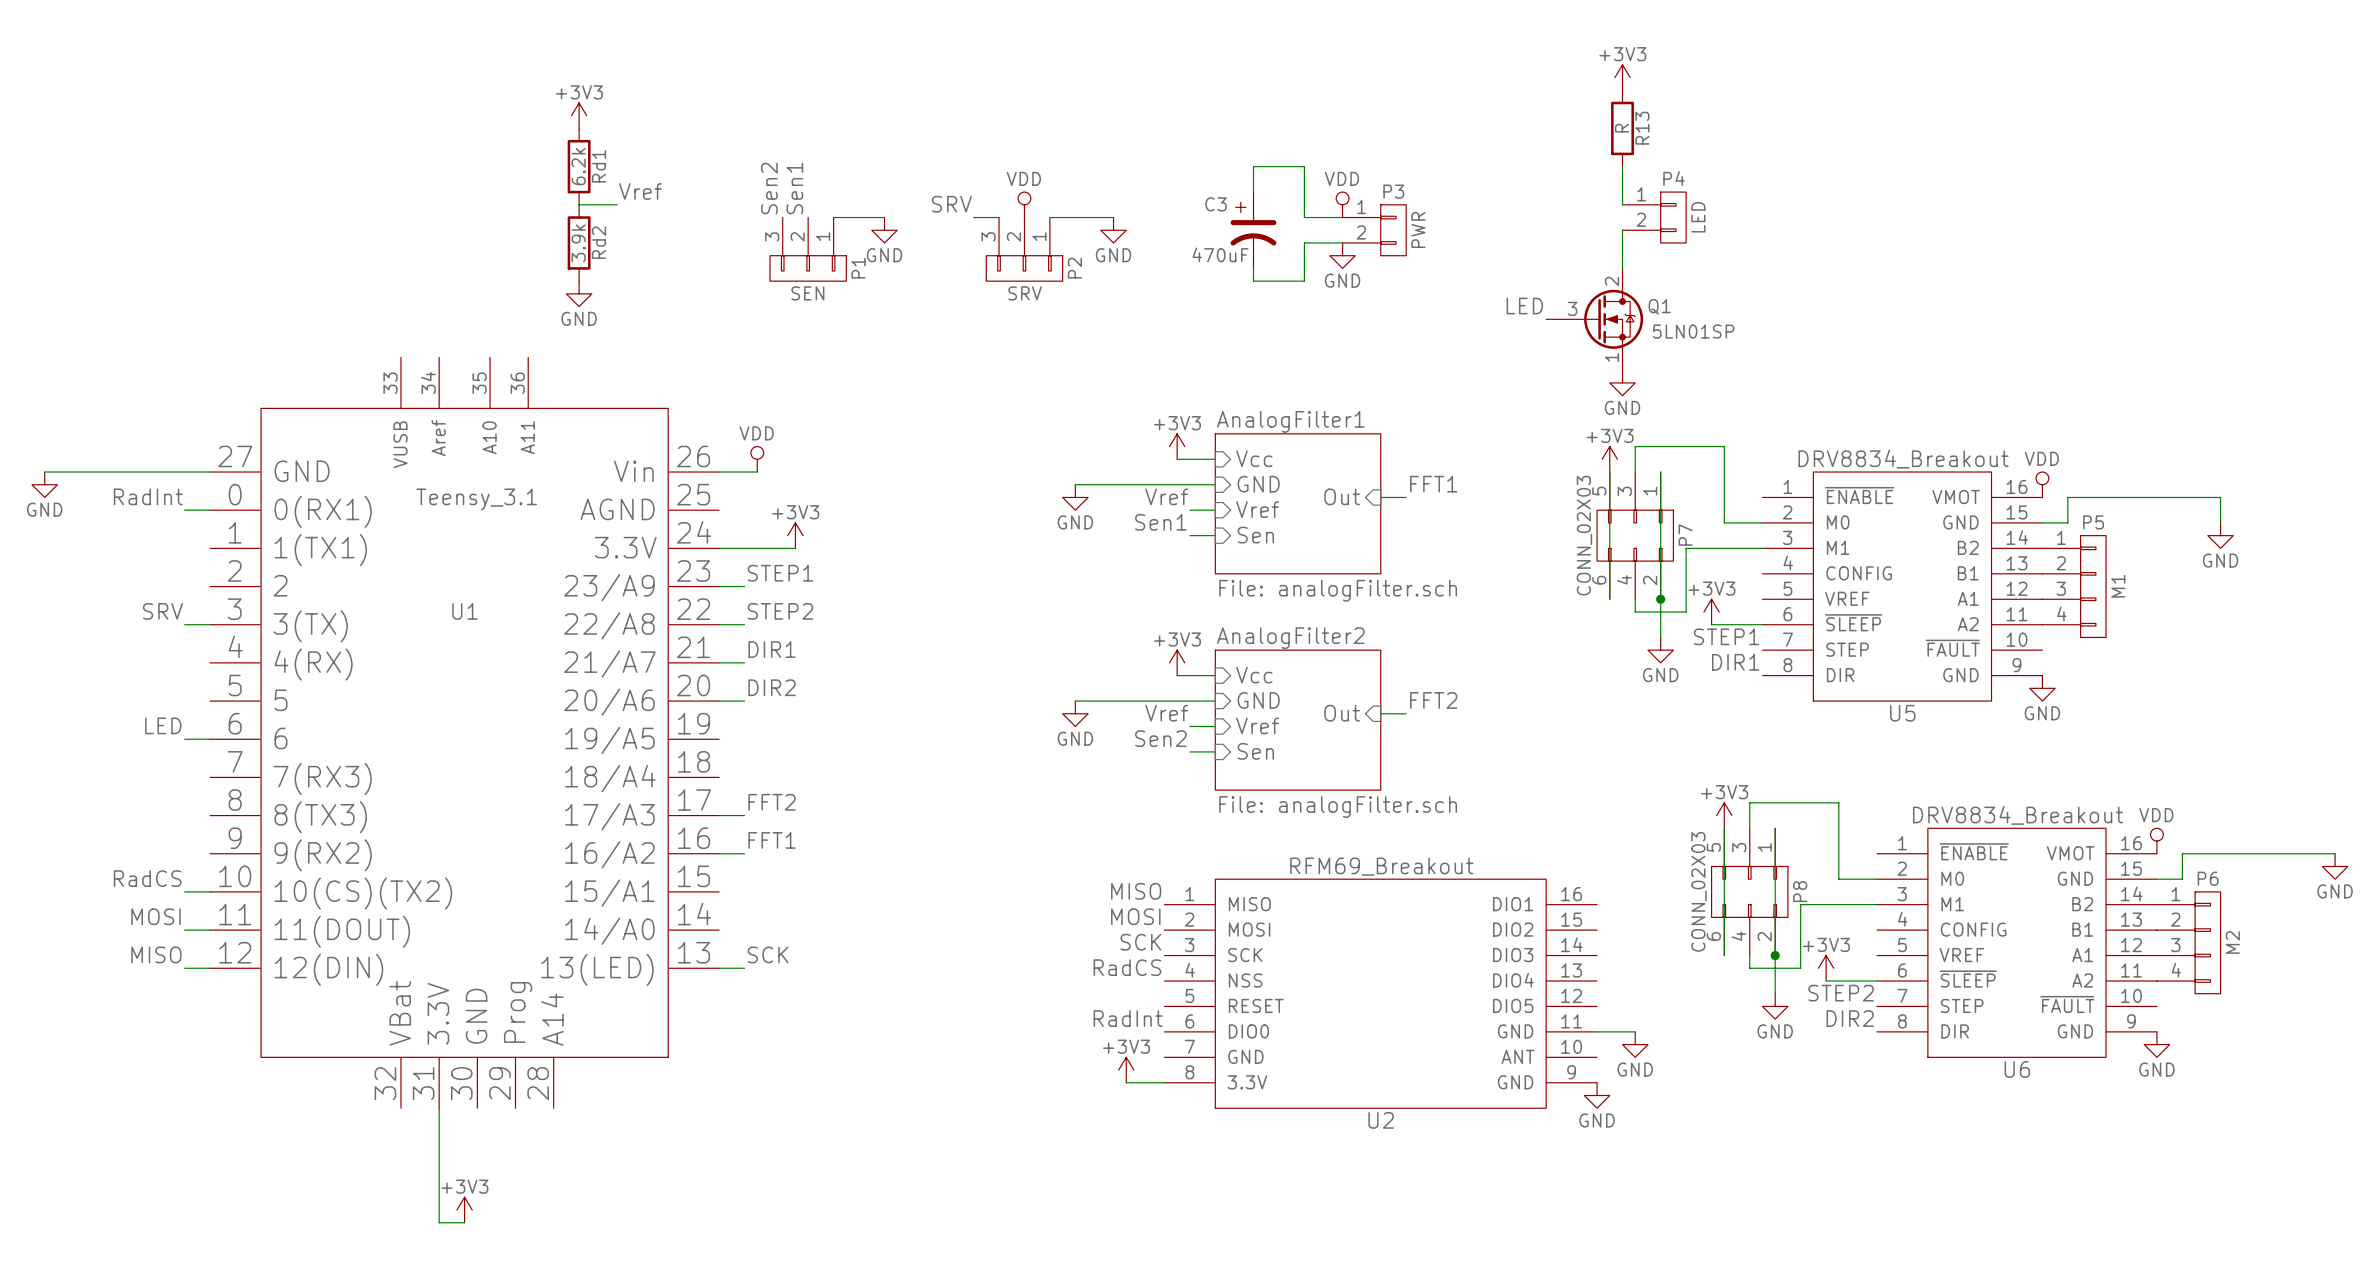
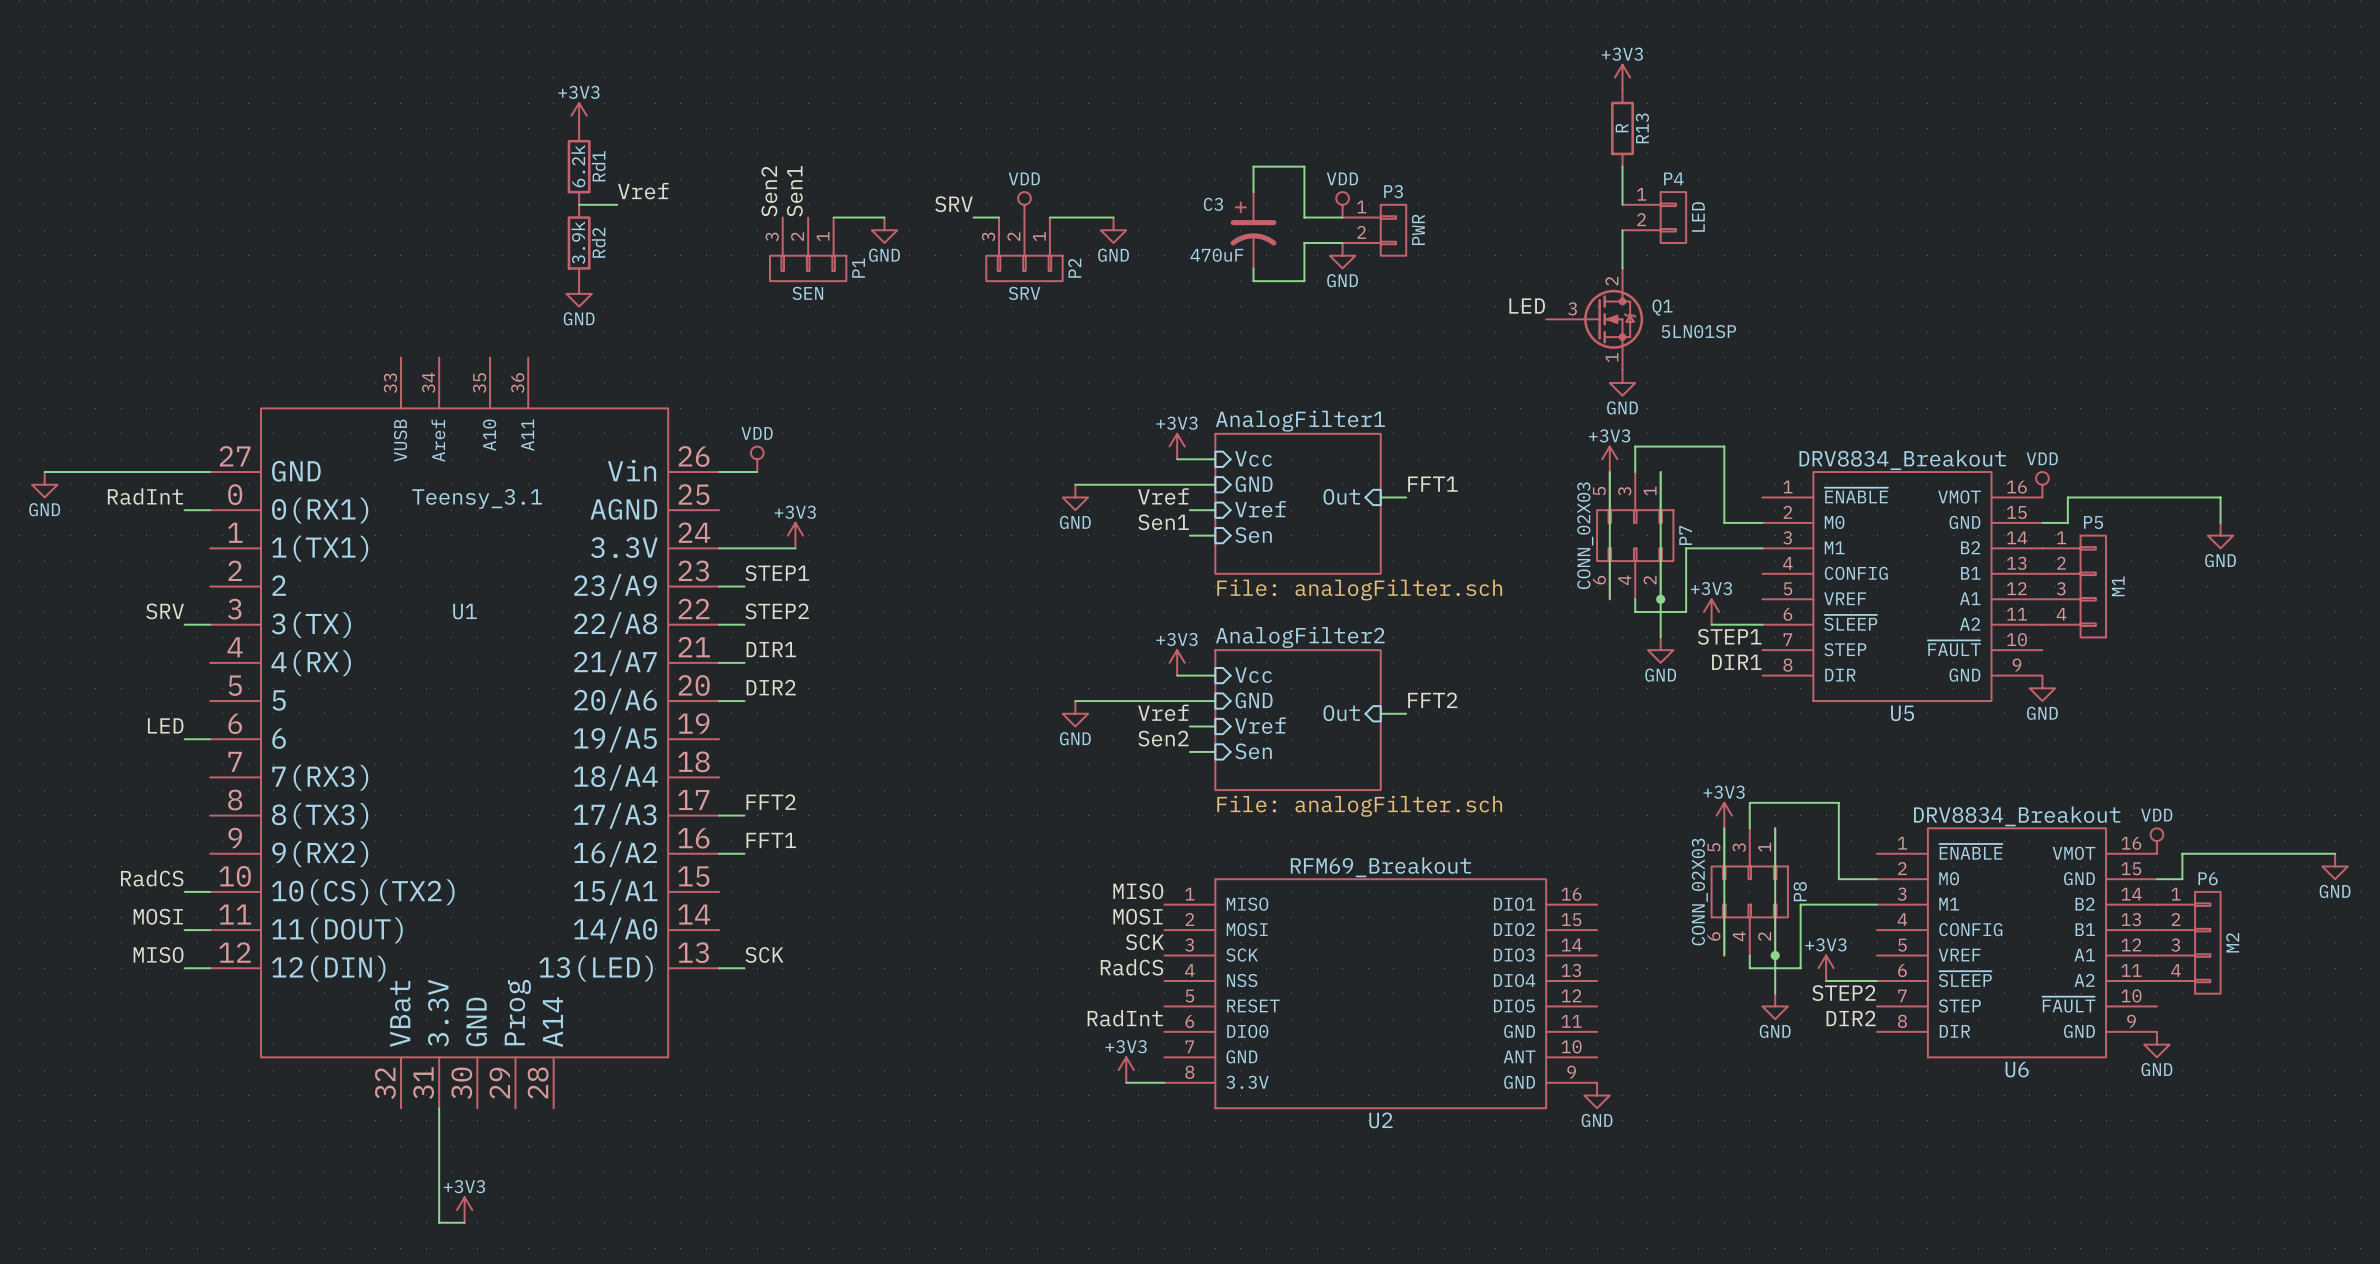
wire: (1597, 1031) (1635, 1031) -> none
power symbol: GND (1635, 1044) -> none

